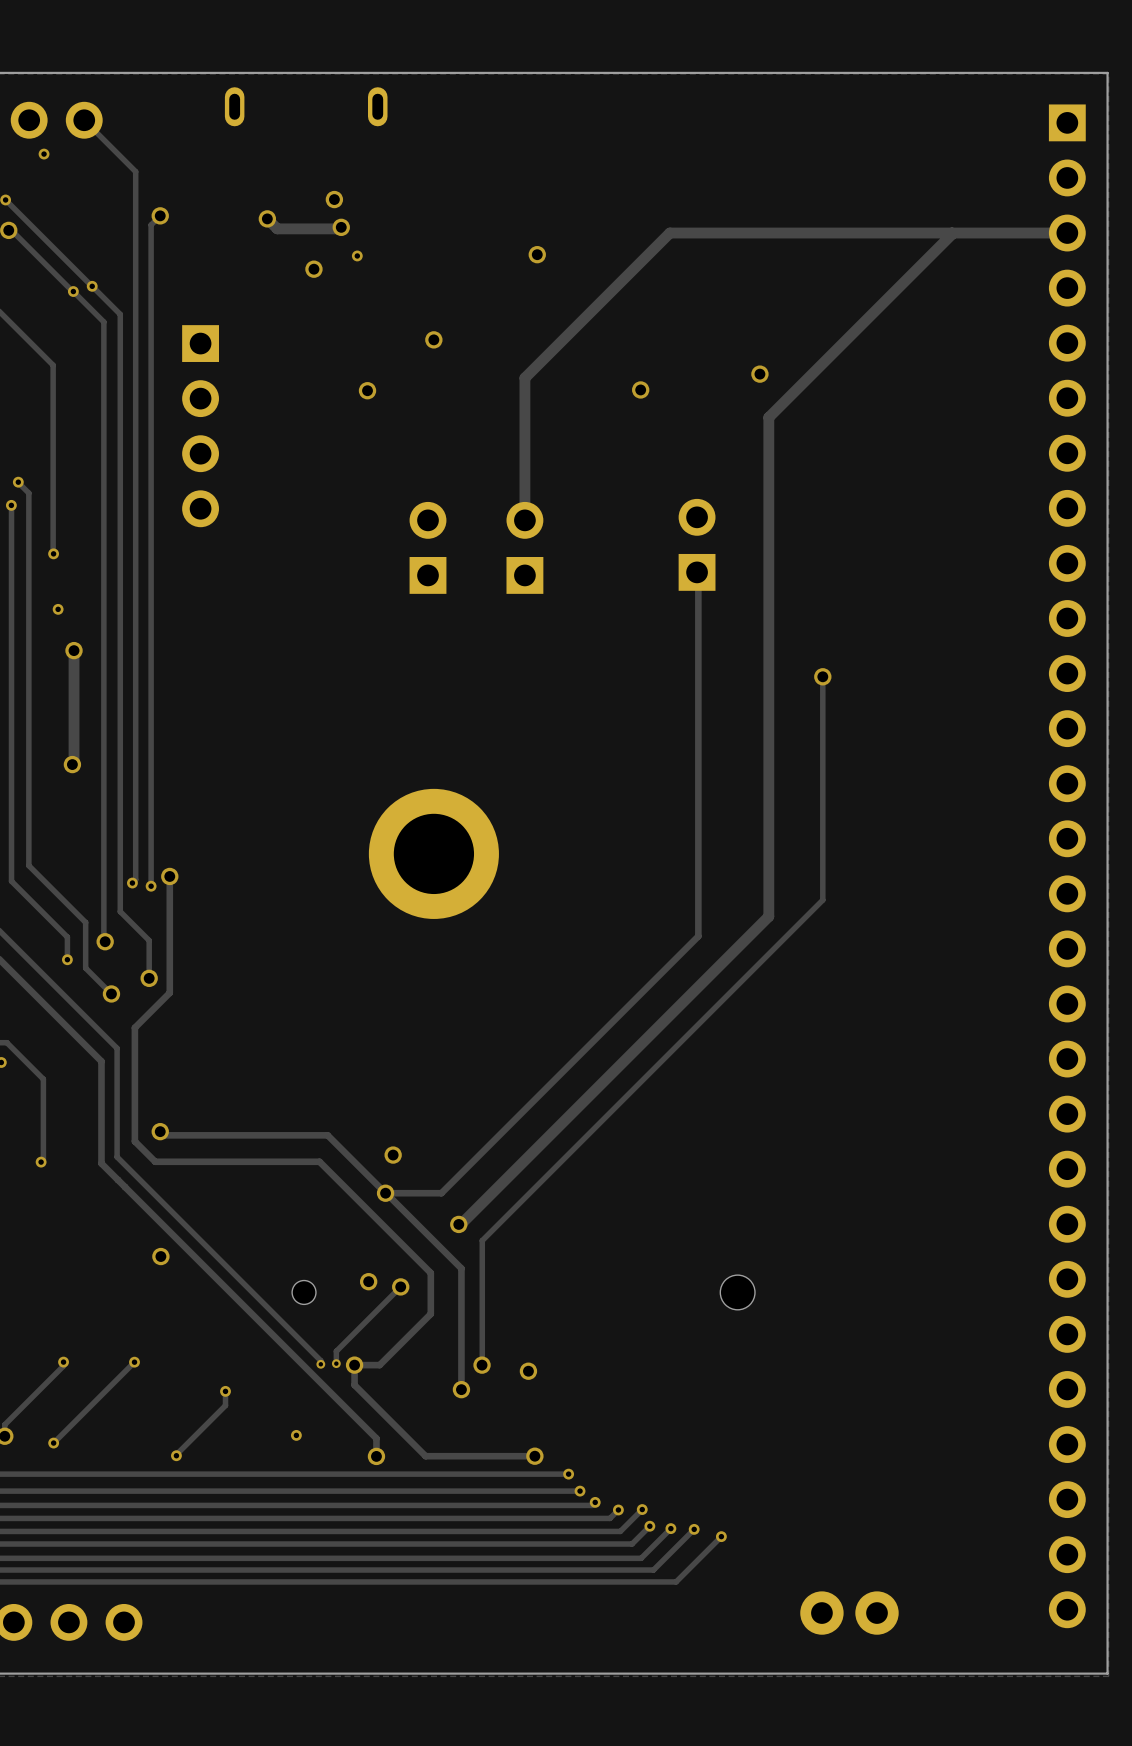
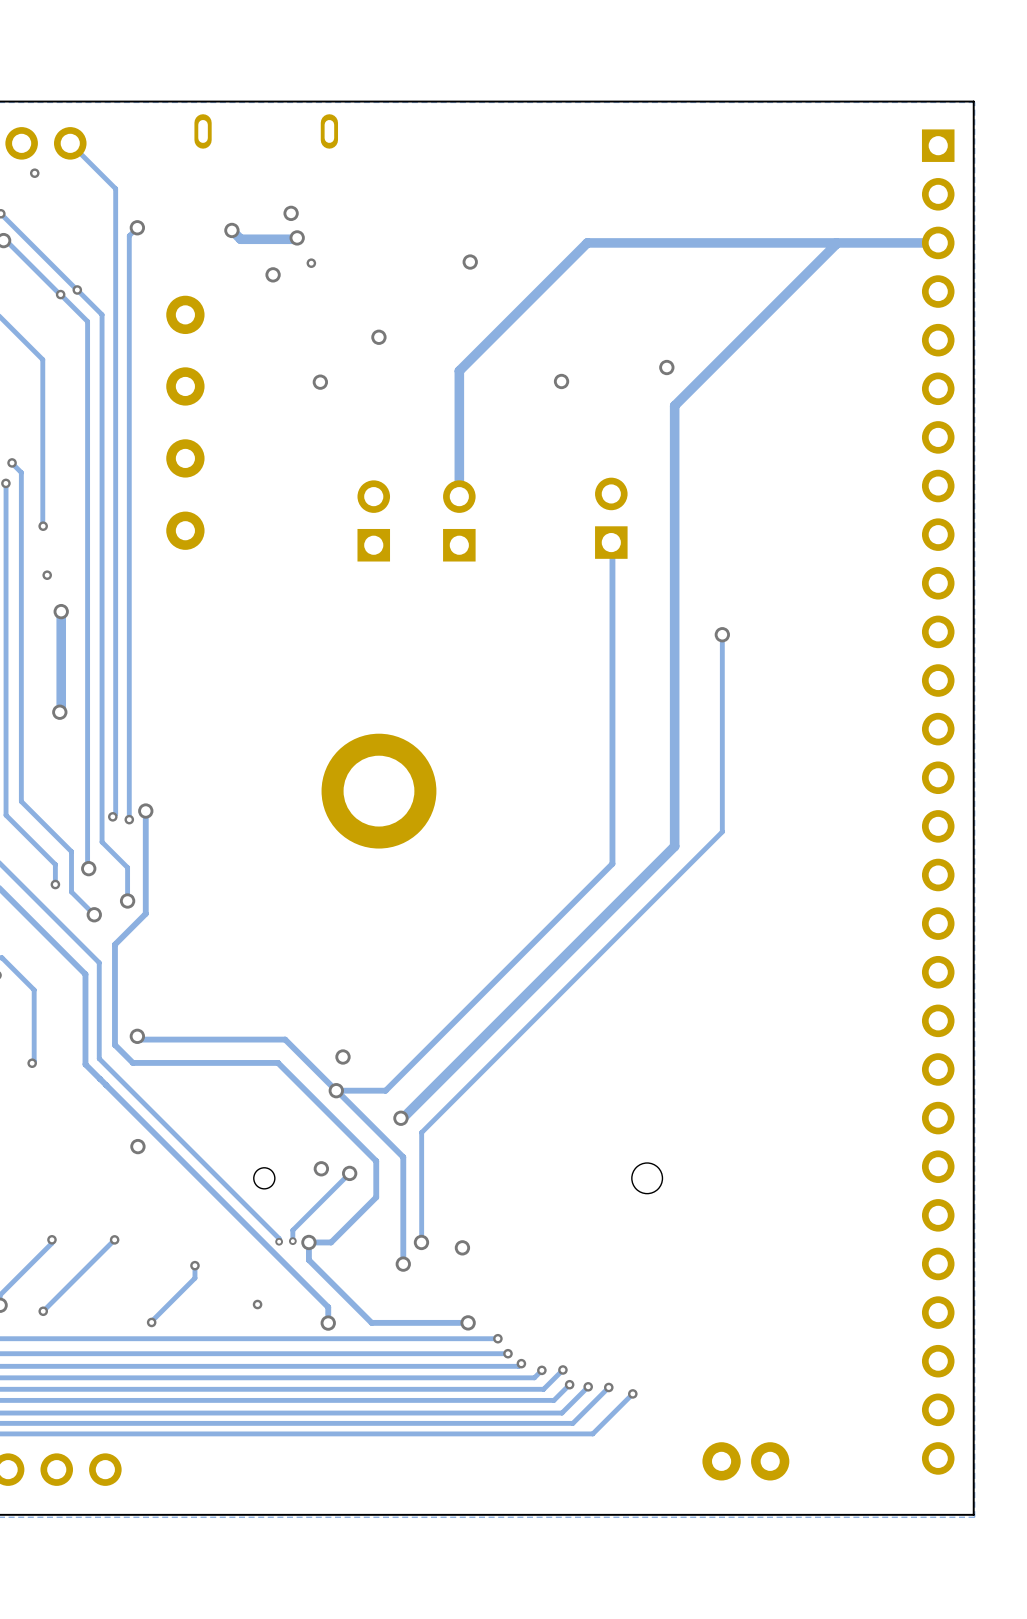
part: none -> (185, 314)
part: none -> (185, 386)
part: (200, 426) -> none
part: none -> (185, 458)
part: none -> (185, 530)

